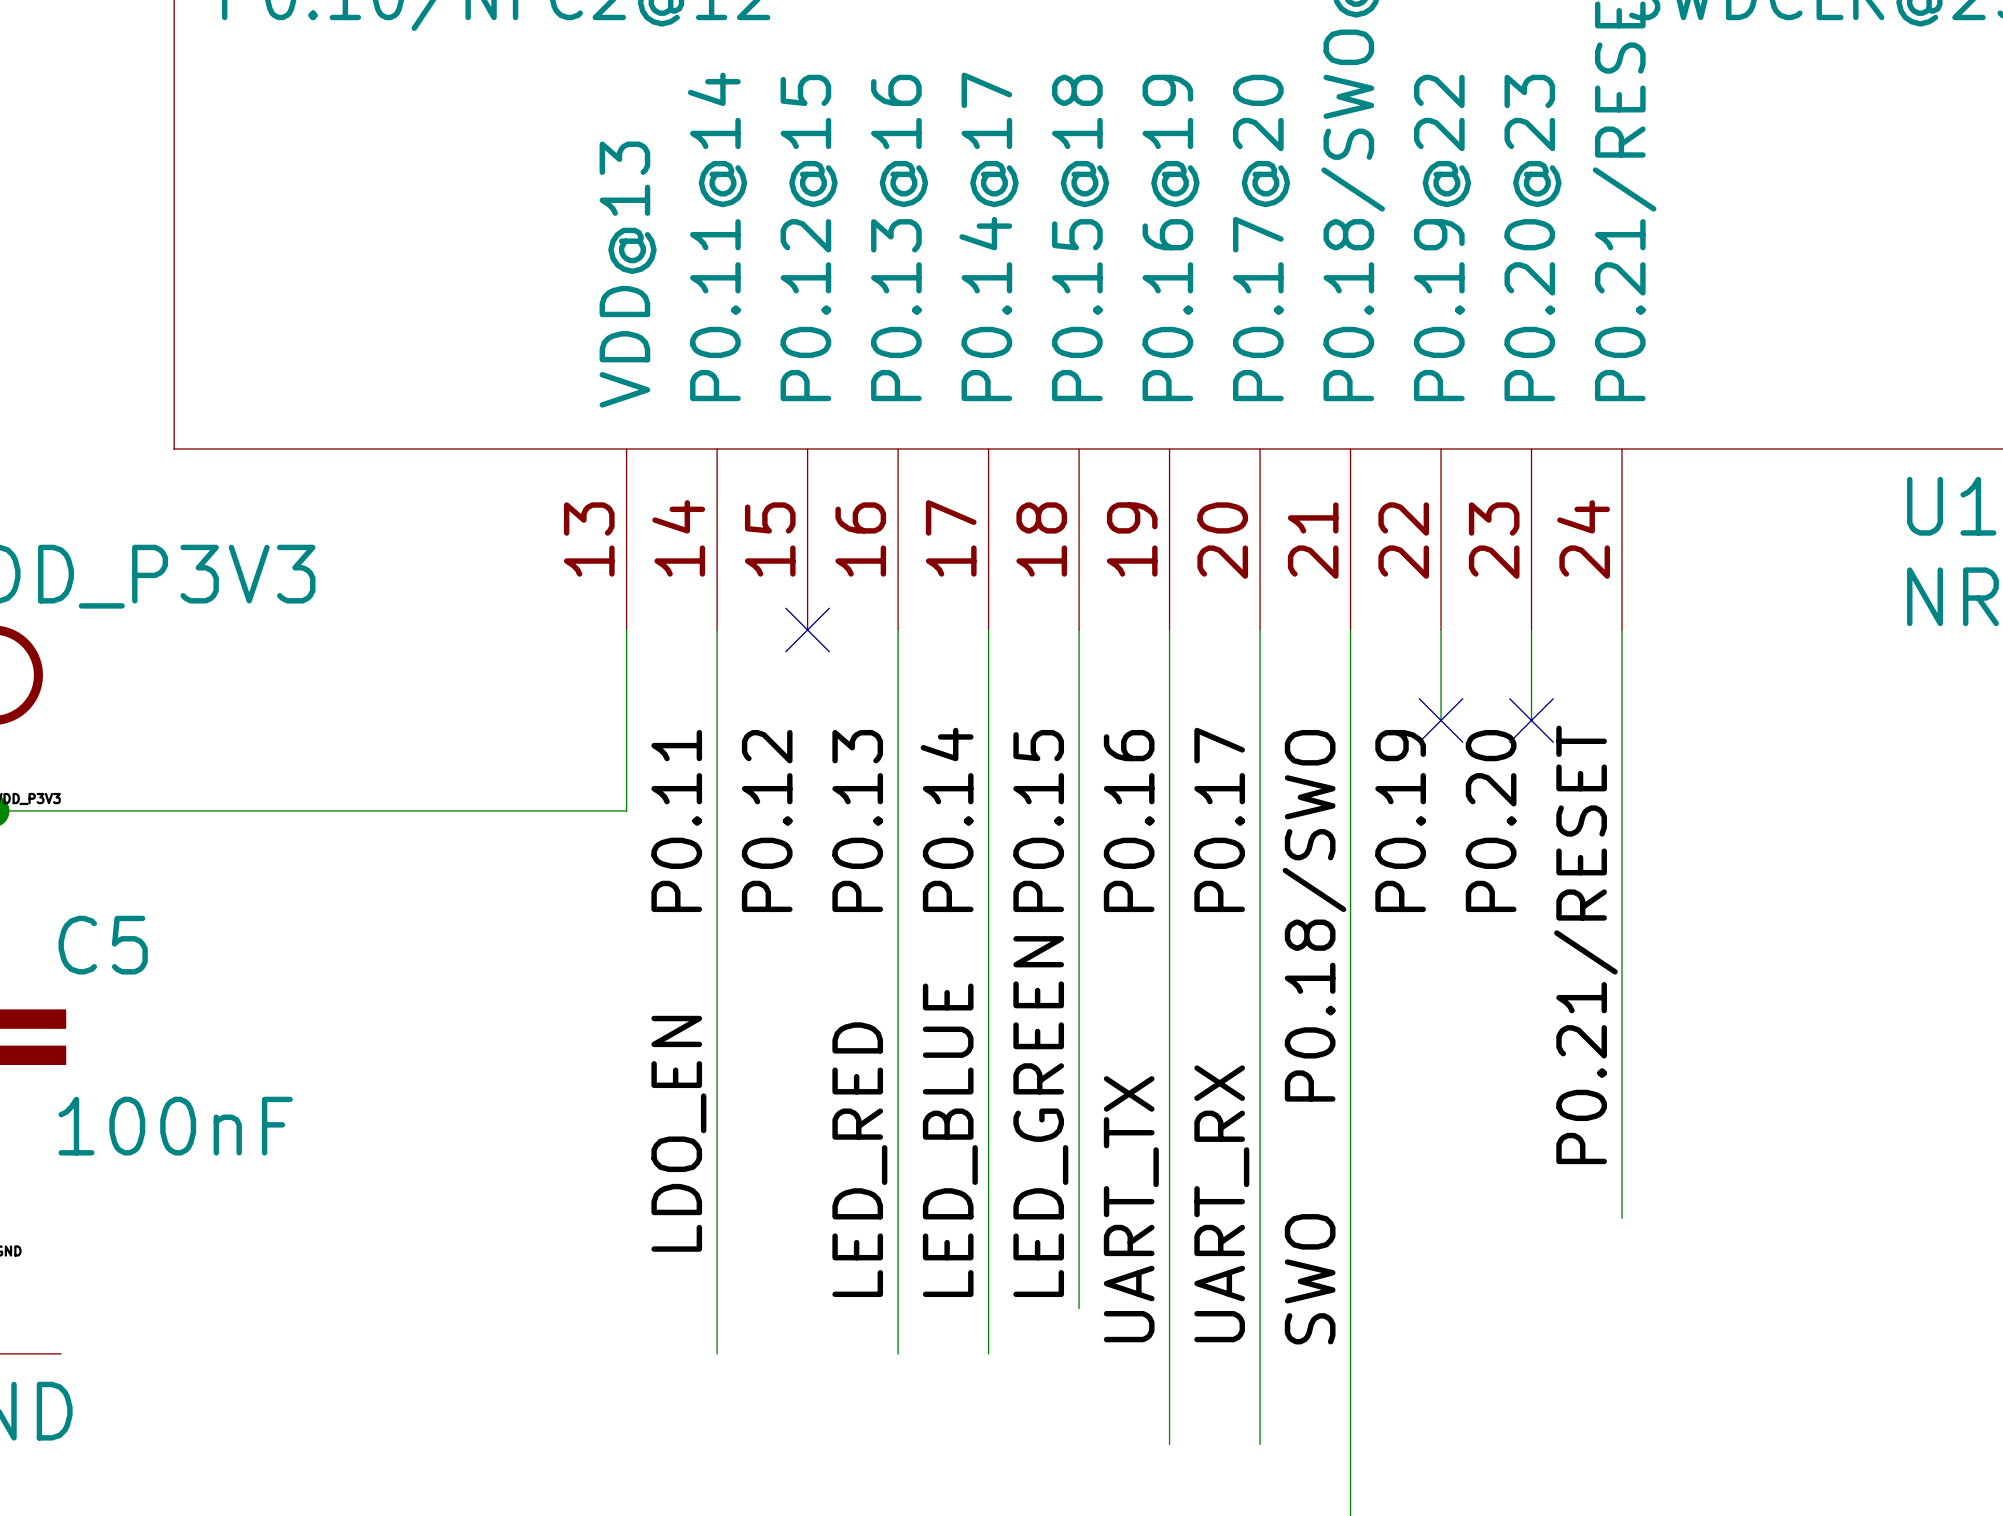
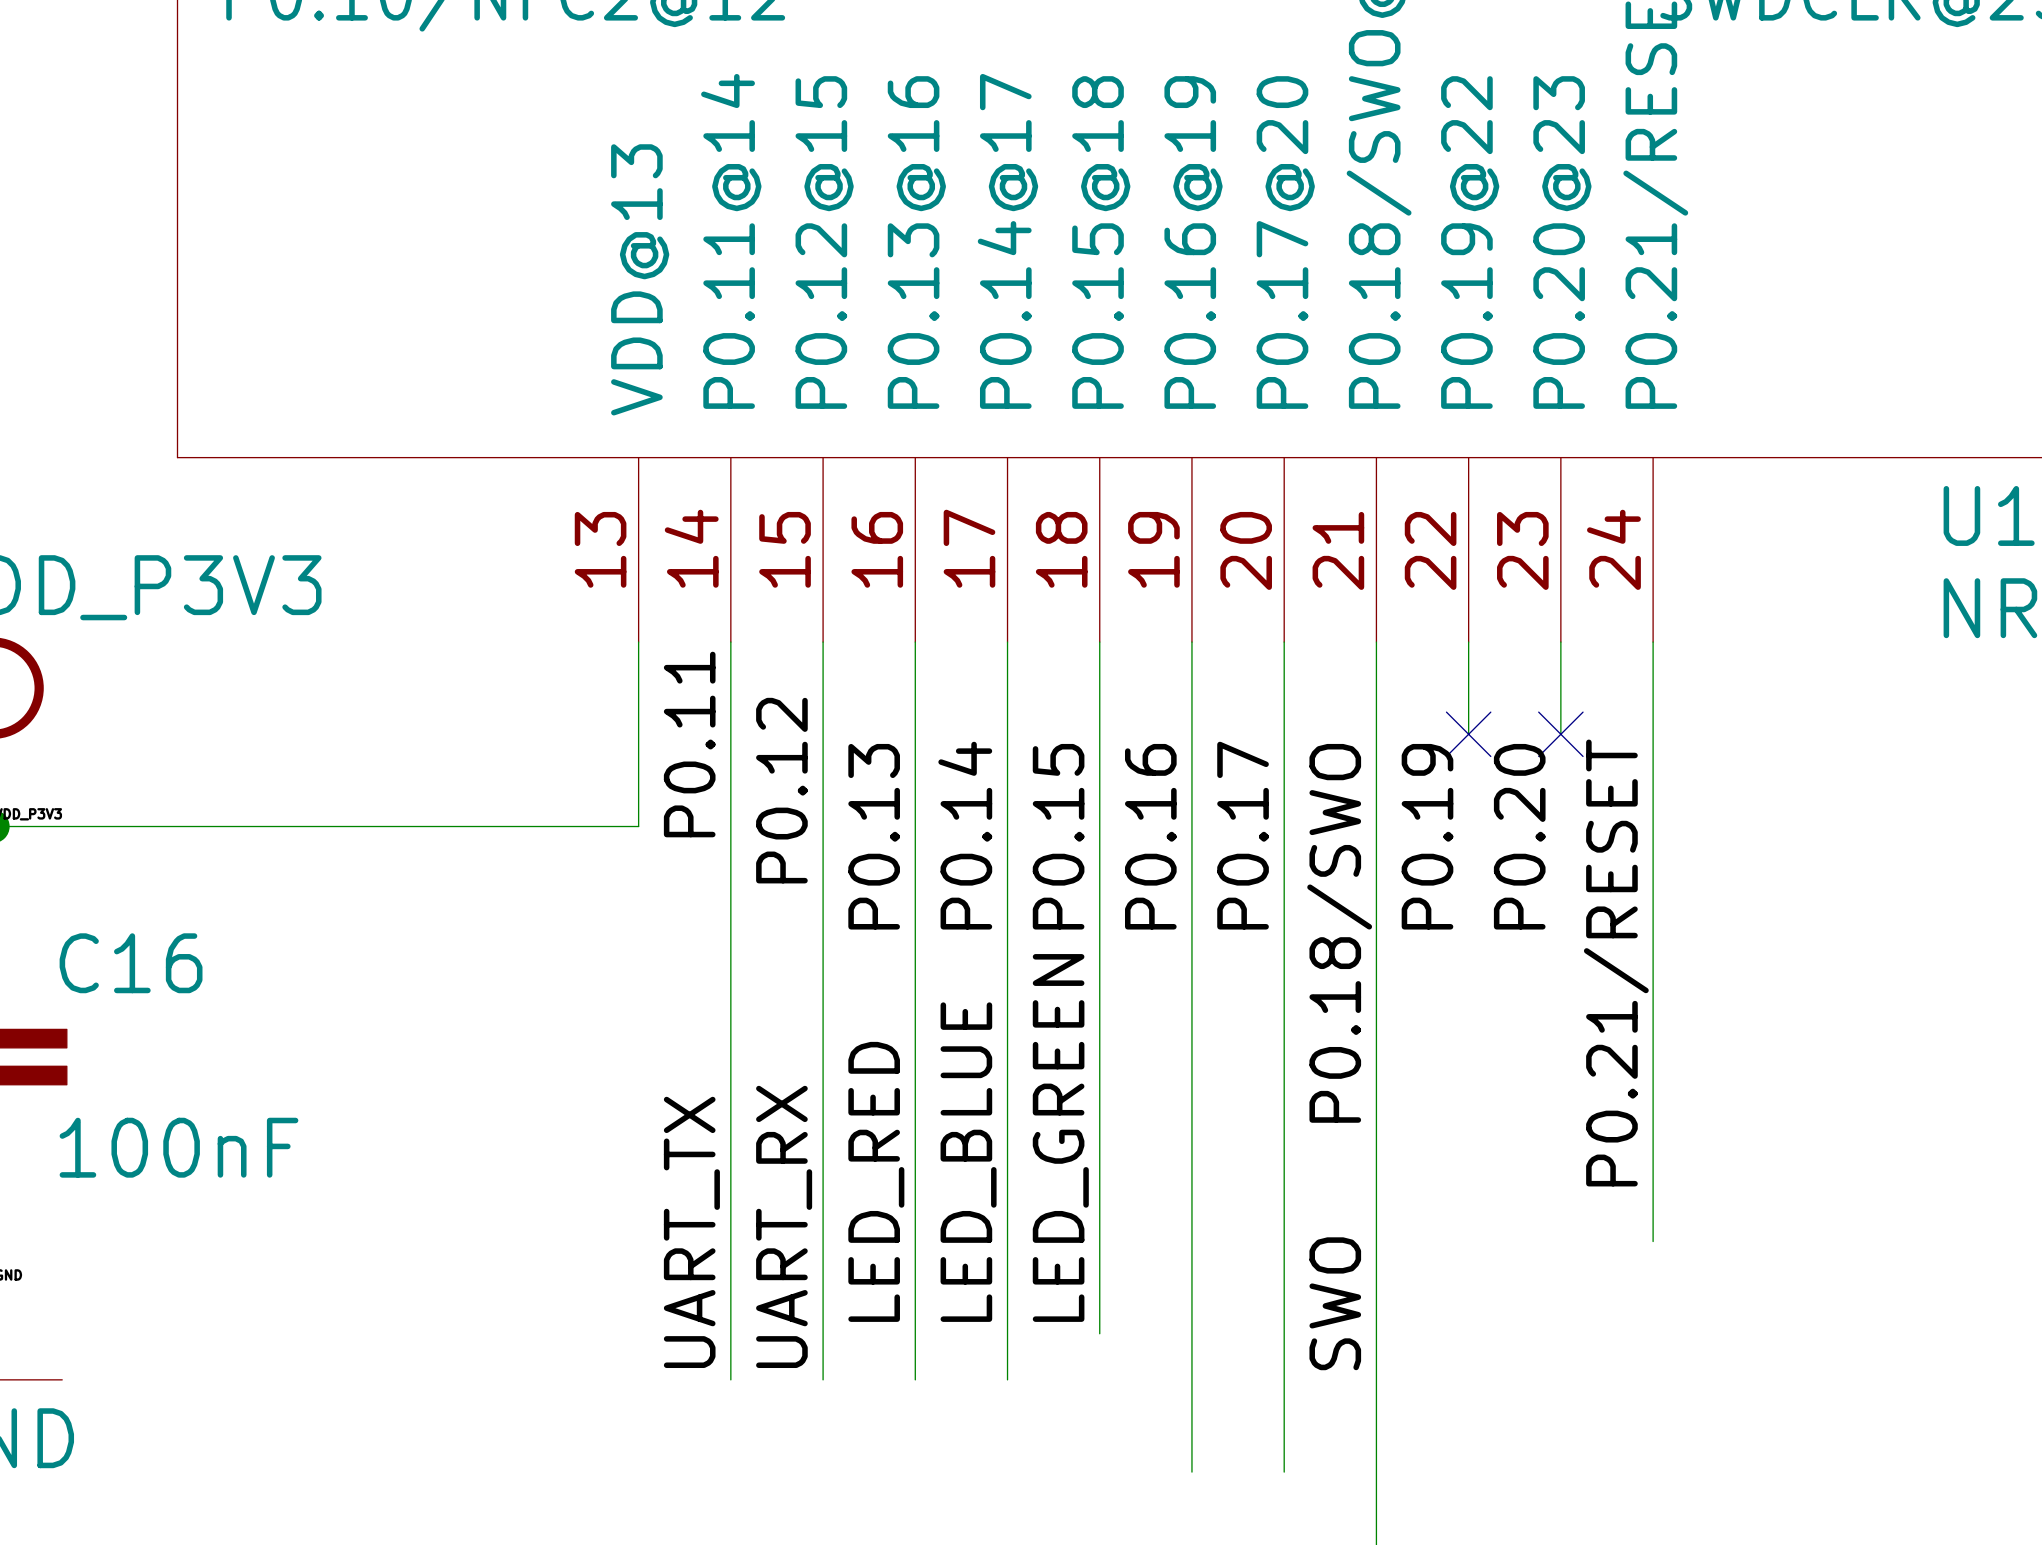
wire: none -> (823, 642) (823, 1379)
no-connect mark: (807, 629) -> none
label position: P0.11 (676, 821) -> P0.11 (689, 744)
label position: P0.12 (767, 821) -> P0.12 (781, 790)
C5 name: C5 (103, 945) -> C16 (131, 963)
label: LDO_EN (678, 1133) -> none
label position: UART_RX (1221, 1203) -> UART_RX (784, 1226)
label position: UART_TX (1131, 1209) -> UART_TX (691, 1232)

